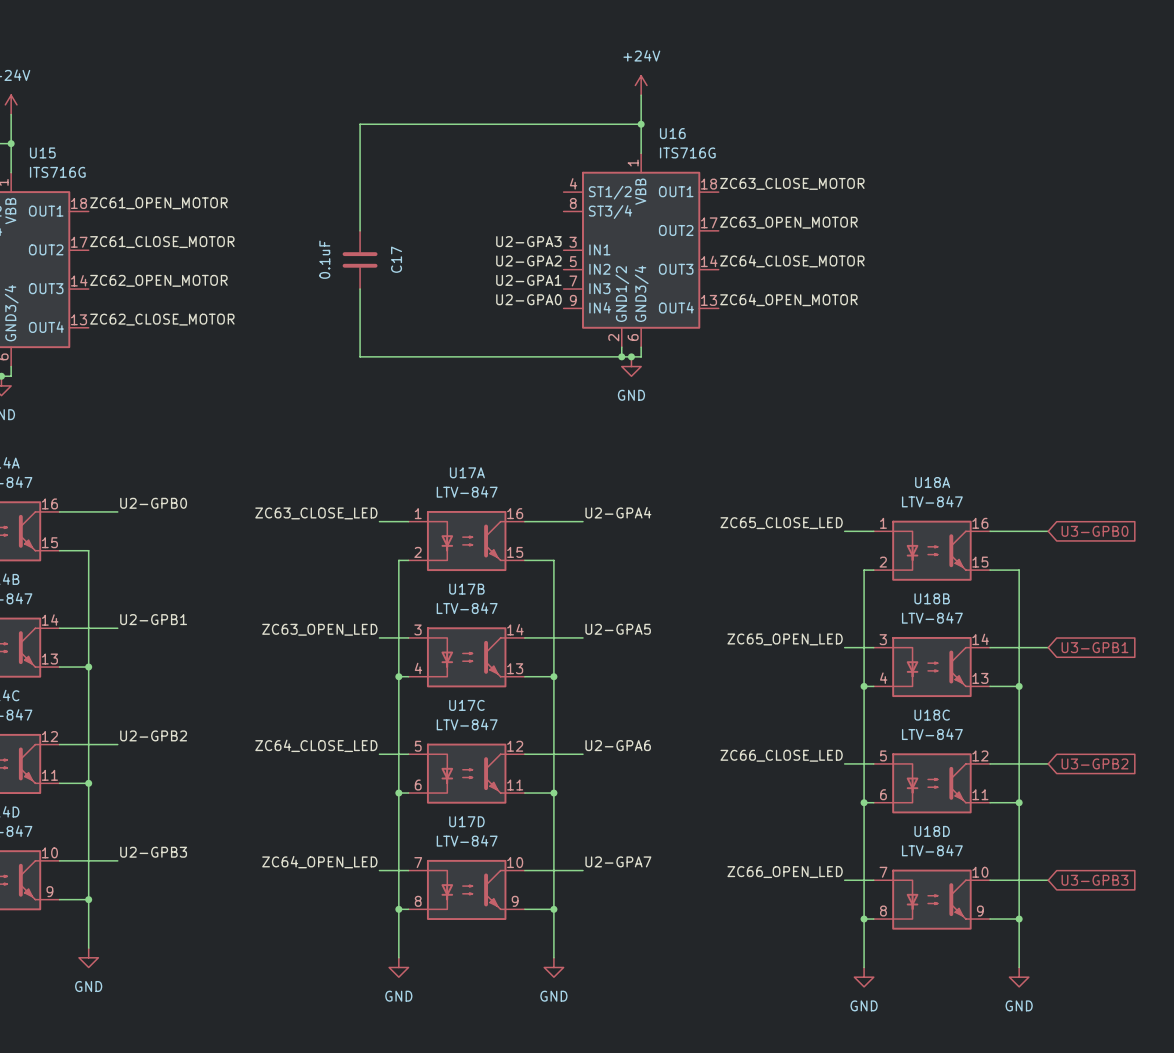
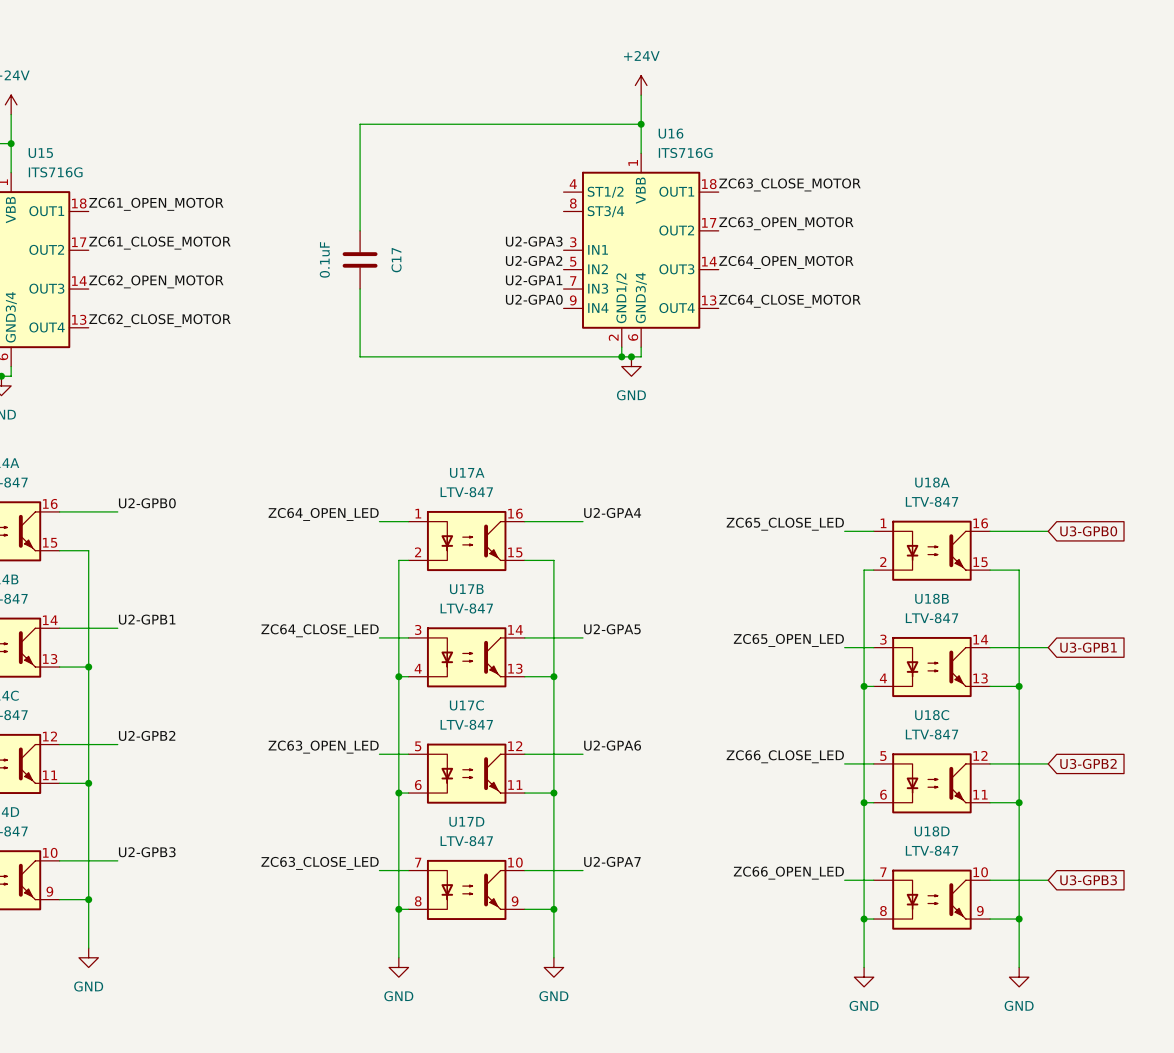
label: ZC64_CLOSE_MOTOR (792, 261) -> ZC64_OPEN_MOTOR (786, 262)
label: ZC64_OPEN_MOTOR (788, 299) -> ZC64_CLOSE_MOTOR (789, 301)
label: ZC63_CLOSE_LED (316, 513) -> ZC64_OPEN_LED (323, 514)
label: ZC63_OPEN_LED (319, 629) -> ZC64_CLOSE_LED (320, 630)
label: ZC64_CLOSE_LED (316, 745) -> ZC63_OPEN_LED (323, 747)
label: ZC64_OPEN_LED (319, 862) -> ZC63_CLOSE_LED (320, 863)

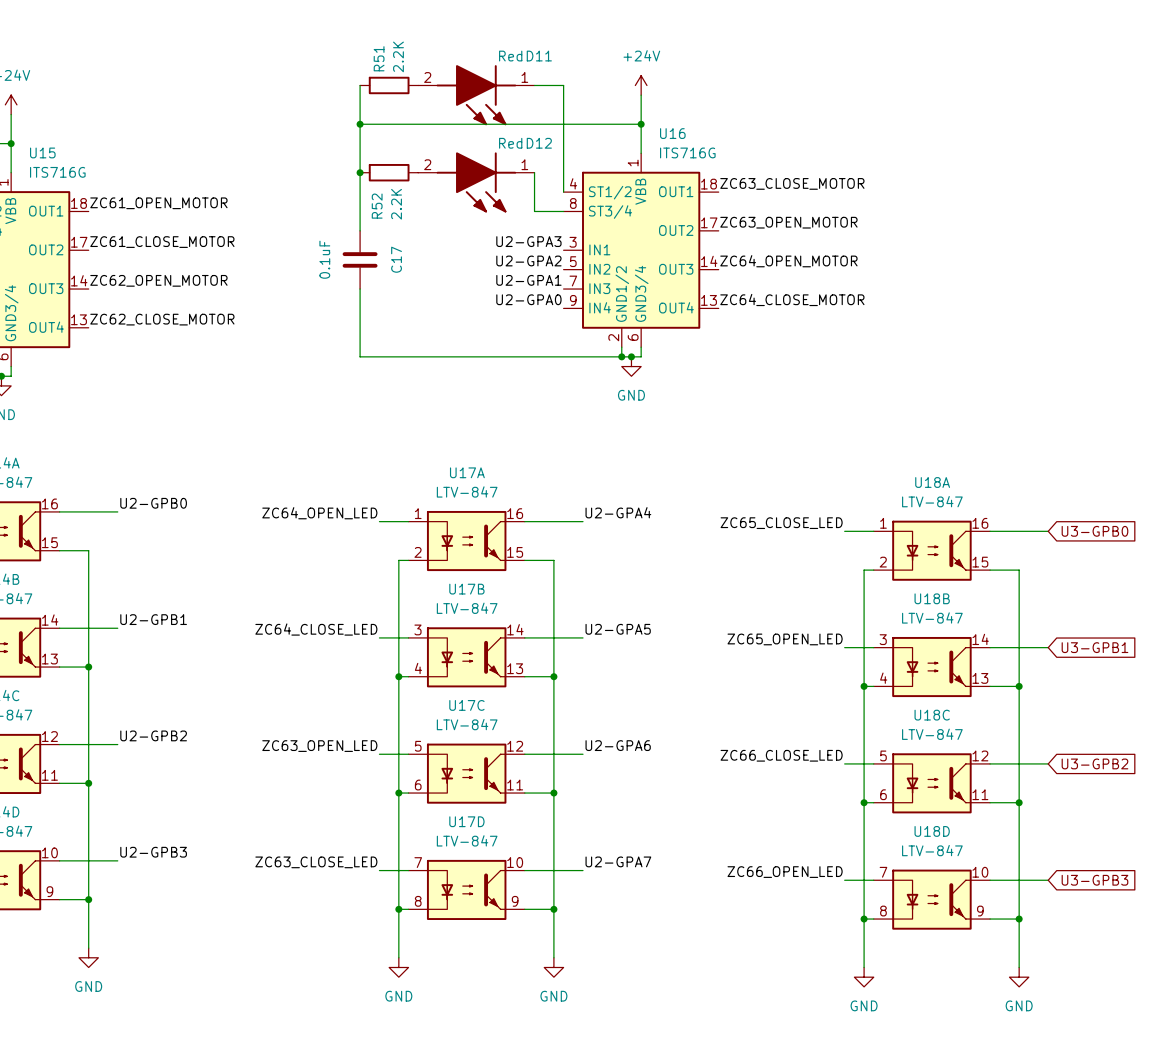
wire: none -> (360, 85) (360, 124)
R51: none -> 2.2K (389, 85)
wire: none -> (534, 85) (563, 85) (563, 192)
D11: none -> Red (476, 95)
junction: none -> (360, 124)
junction: none -> (360, 172)
R52: none -> 2.2K (389, 172)
wire: none -> (534, 172) (534, 211) (563, 211)
D12: none -> Red (476, 182)

